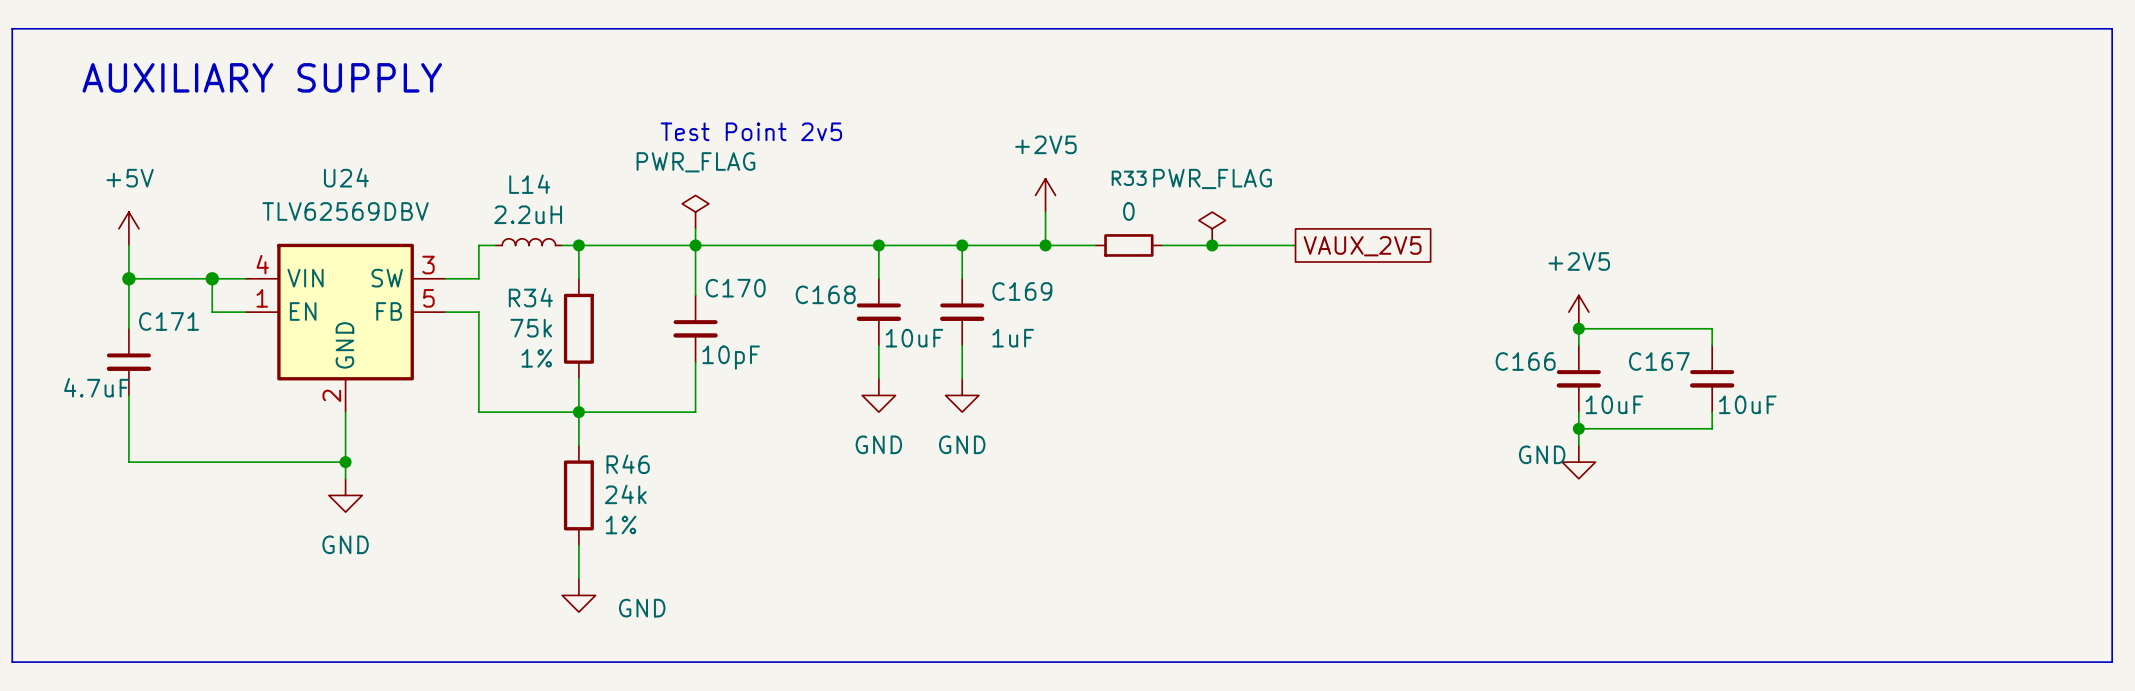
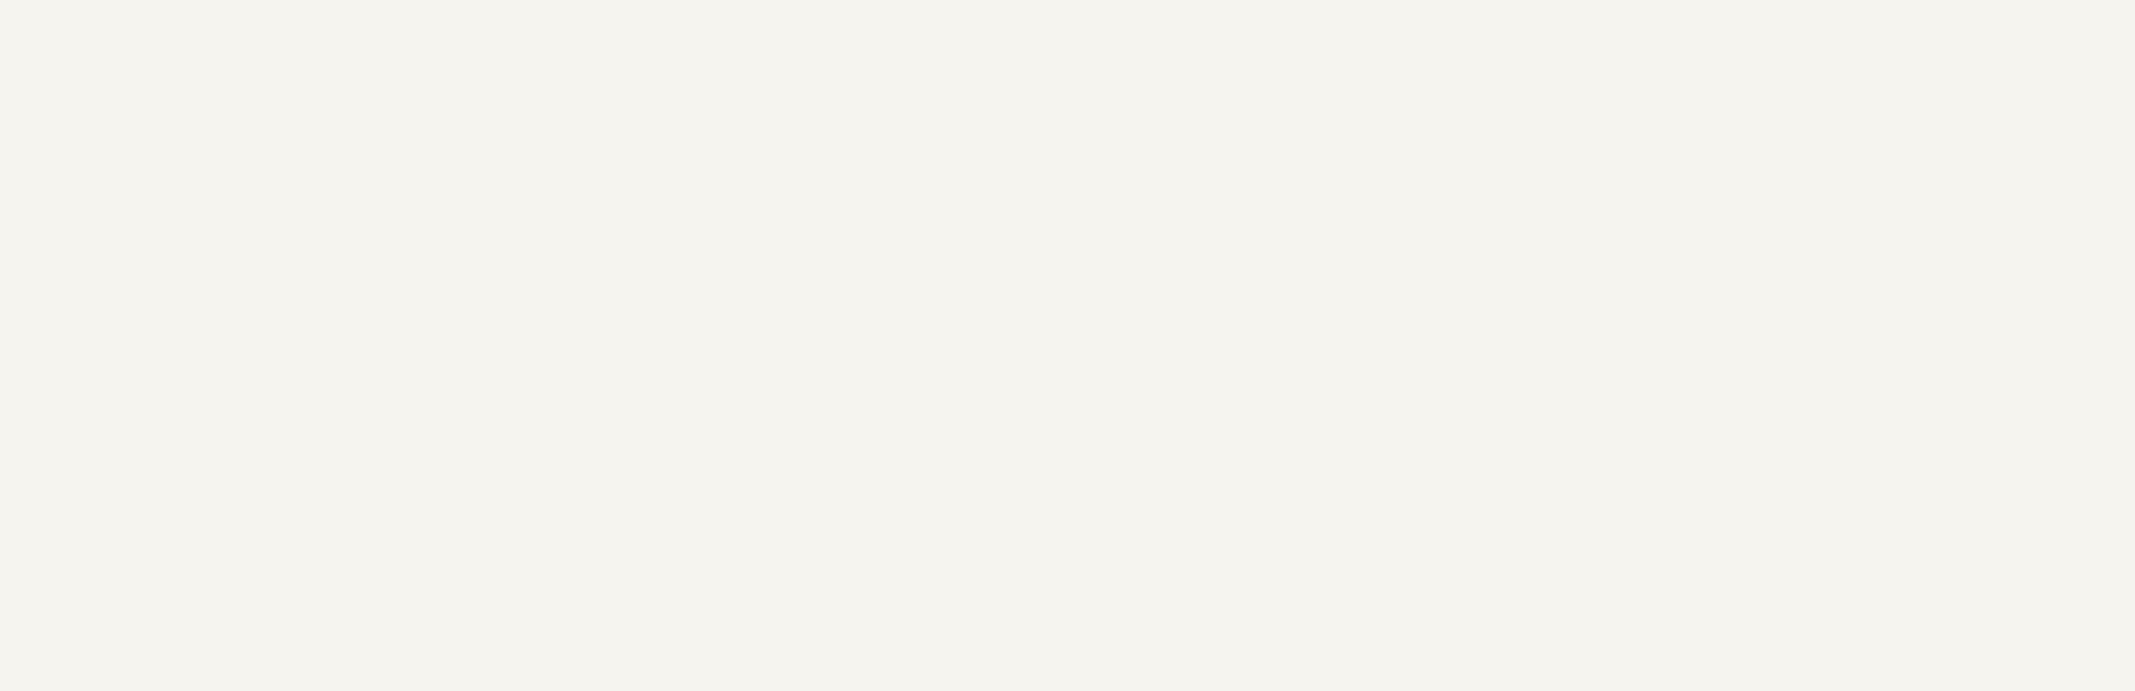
line: (12, 28) (2112, 28) (2112, 662) (12, 662) (12, 28) -> none
text: AUXILIARY SUPPLY (262, 77) -> none
text: Test Point 2v5 (751, 131) -> none
power symbol: +2V5 (1045, 195) -> none
power symbol: PWR_FLAG (695, 212) -> none
wire: (1045, 212) (1045, 245) -> none
power symbol: +5V (128, 228) -> none
wire: (695, 228) (695, 295) -> none
power symbol: PWR_FLAG (1212, 228) -> none
L14: 2.2uH (528, 242) -> none
wire: (128, 245) (128, 328) -> none
wire: (495, 245) (478, 245) (478, 278) (445, 278) -> none
wire: (562, 245) (1095, 245) -> none
wire: (578, 245) (578, 278) -> none
junction: (578, 245) -> none
junction: (695, 245) -> none
wire: (878, 245) (878, 278) -> none
junction: (878, 245) -> none
wire: (962, 245) (962, 278) -> none
junction: (962, 245) -> none
junction: (1045, 245) -> none
R33: 0 (1128, 245) -> none
wire: (1162, 245) (1295, 245) -> none
junction: (1212, 245) -> none
global label: VAUX_2V5 (1362, 246) -> none
wire: (128, 278) (245, 278) -> none
junction: (128, 278) -> none
wire: (212, 278) (212, 312) (245, 312) -> none
junction: (212, 278) -> none
wire: (445, 312) (478, 312) (478, 412) (695, 412) (695, 362) -> none
C168: 10uF (878, 312) -> none
C169: 1uF (962, 312) -> none
power symbol: +2V5 (1578, 312) -> none
U24: TLV62569DBV (345, 327) -> none
R34: 75k (578, 328) -> none
C170: 10pF (695, 328) -> none
junction: (1578, 328) -> none
wire: (878, 345) (878, 378) -> none
wire: (962, 345) (962, 378) -> none
wire: (1578, 345) (1578, 328) (1712, 328) (1712, 345) -> none
C171: 4.7uF (128, 362) -> none
wire: (578, 378) (578, 445) -> none
C166: 10uF (1578, 378) -> none
C167: 10uF (1712, 378) -> none
wire: (128, 395) (128, 462) (345, 462) -> none
power symbol: GND (878, 395) -> none
power symbol: GND (962, 395) -> none
wire: (345, 412) (345, 478) -> none
junction: (578, 412) -> none
wire: (1578, 412) (1578, 445) -> none
wire: (1712, 412) (1712, 428) (1578, 428) -> none
junction: (1578, 428) -> none
junction: (345, 462) -> none
power symbol: GND (1578, 462) -> none
power symbol: GND (345, 495) -> none
R46: 24k (578, 495) -> none
wire: (578, 545) (578, 578) -> none
power symbol: GND (578, 595) -> none

